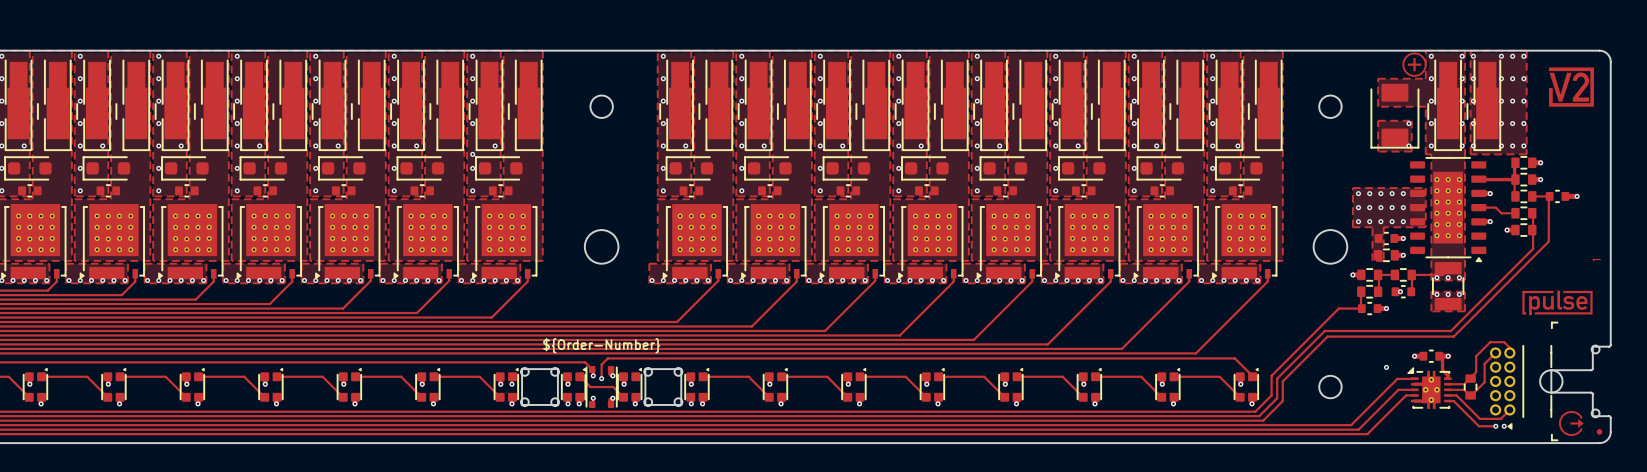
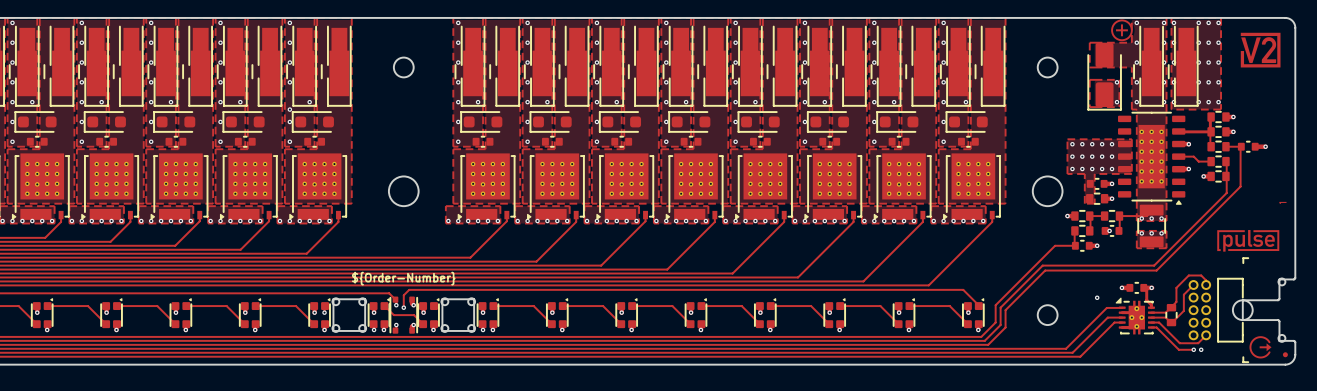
part footprint: [1370, 83, 1420, 149] -> [1087, 42, 1122, 111]
part footprint: [1490, 345, 1552, 430] -> [1188, 278, 1244, 343]

